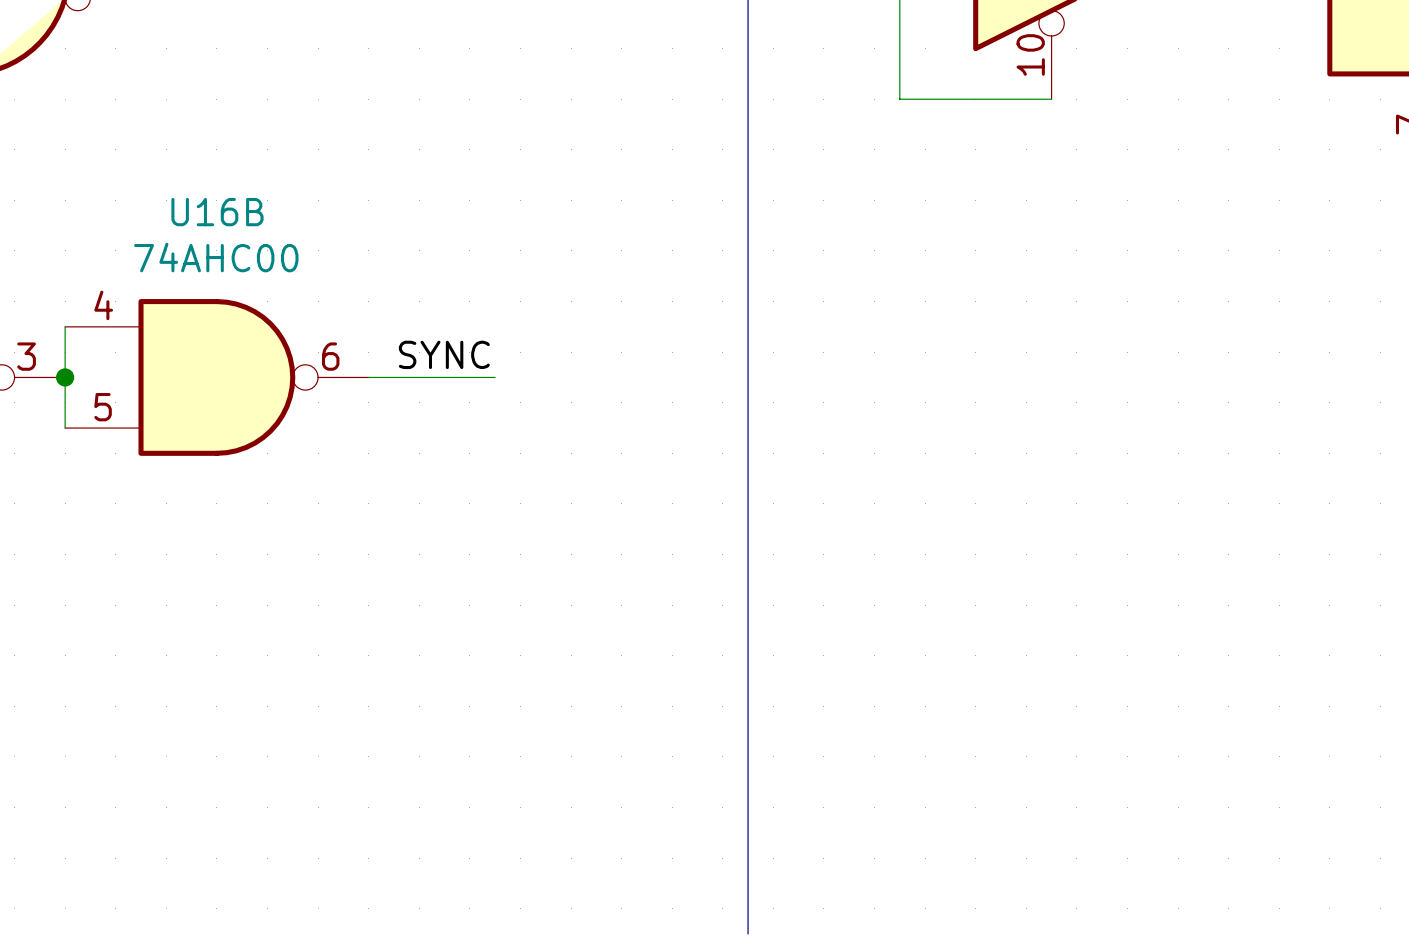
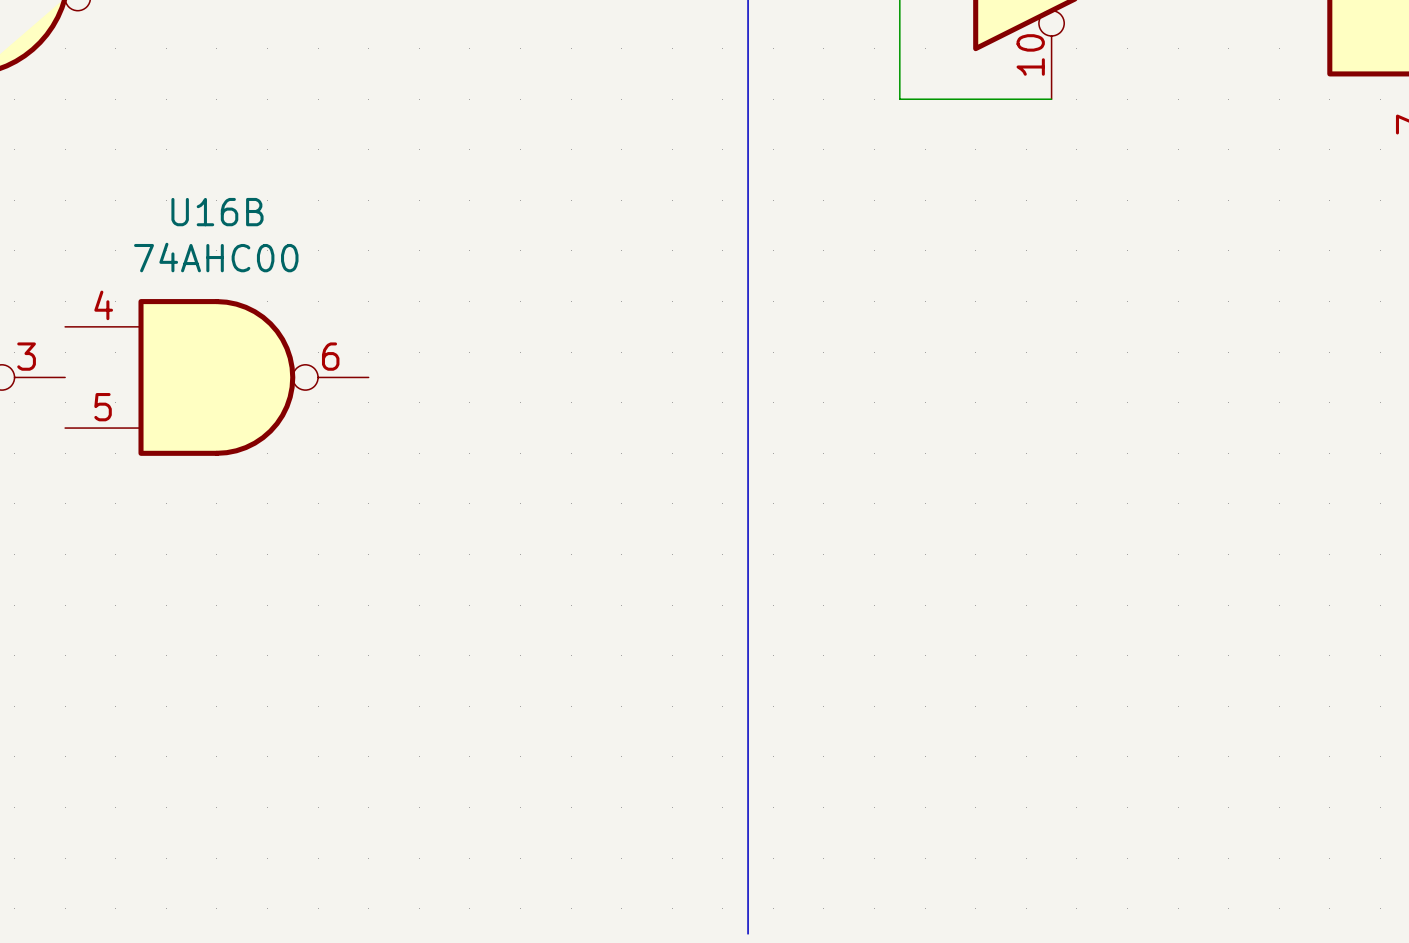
wire: (65, 326) (65, 428) -> none
label: SYNC (444, 354) -> none
junction: (65, 377) -> none
wire: (368, 377) (495, 377) -> none

